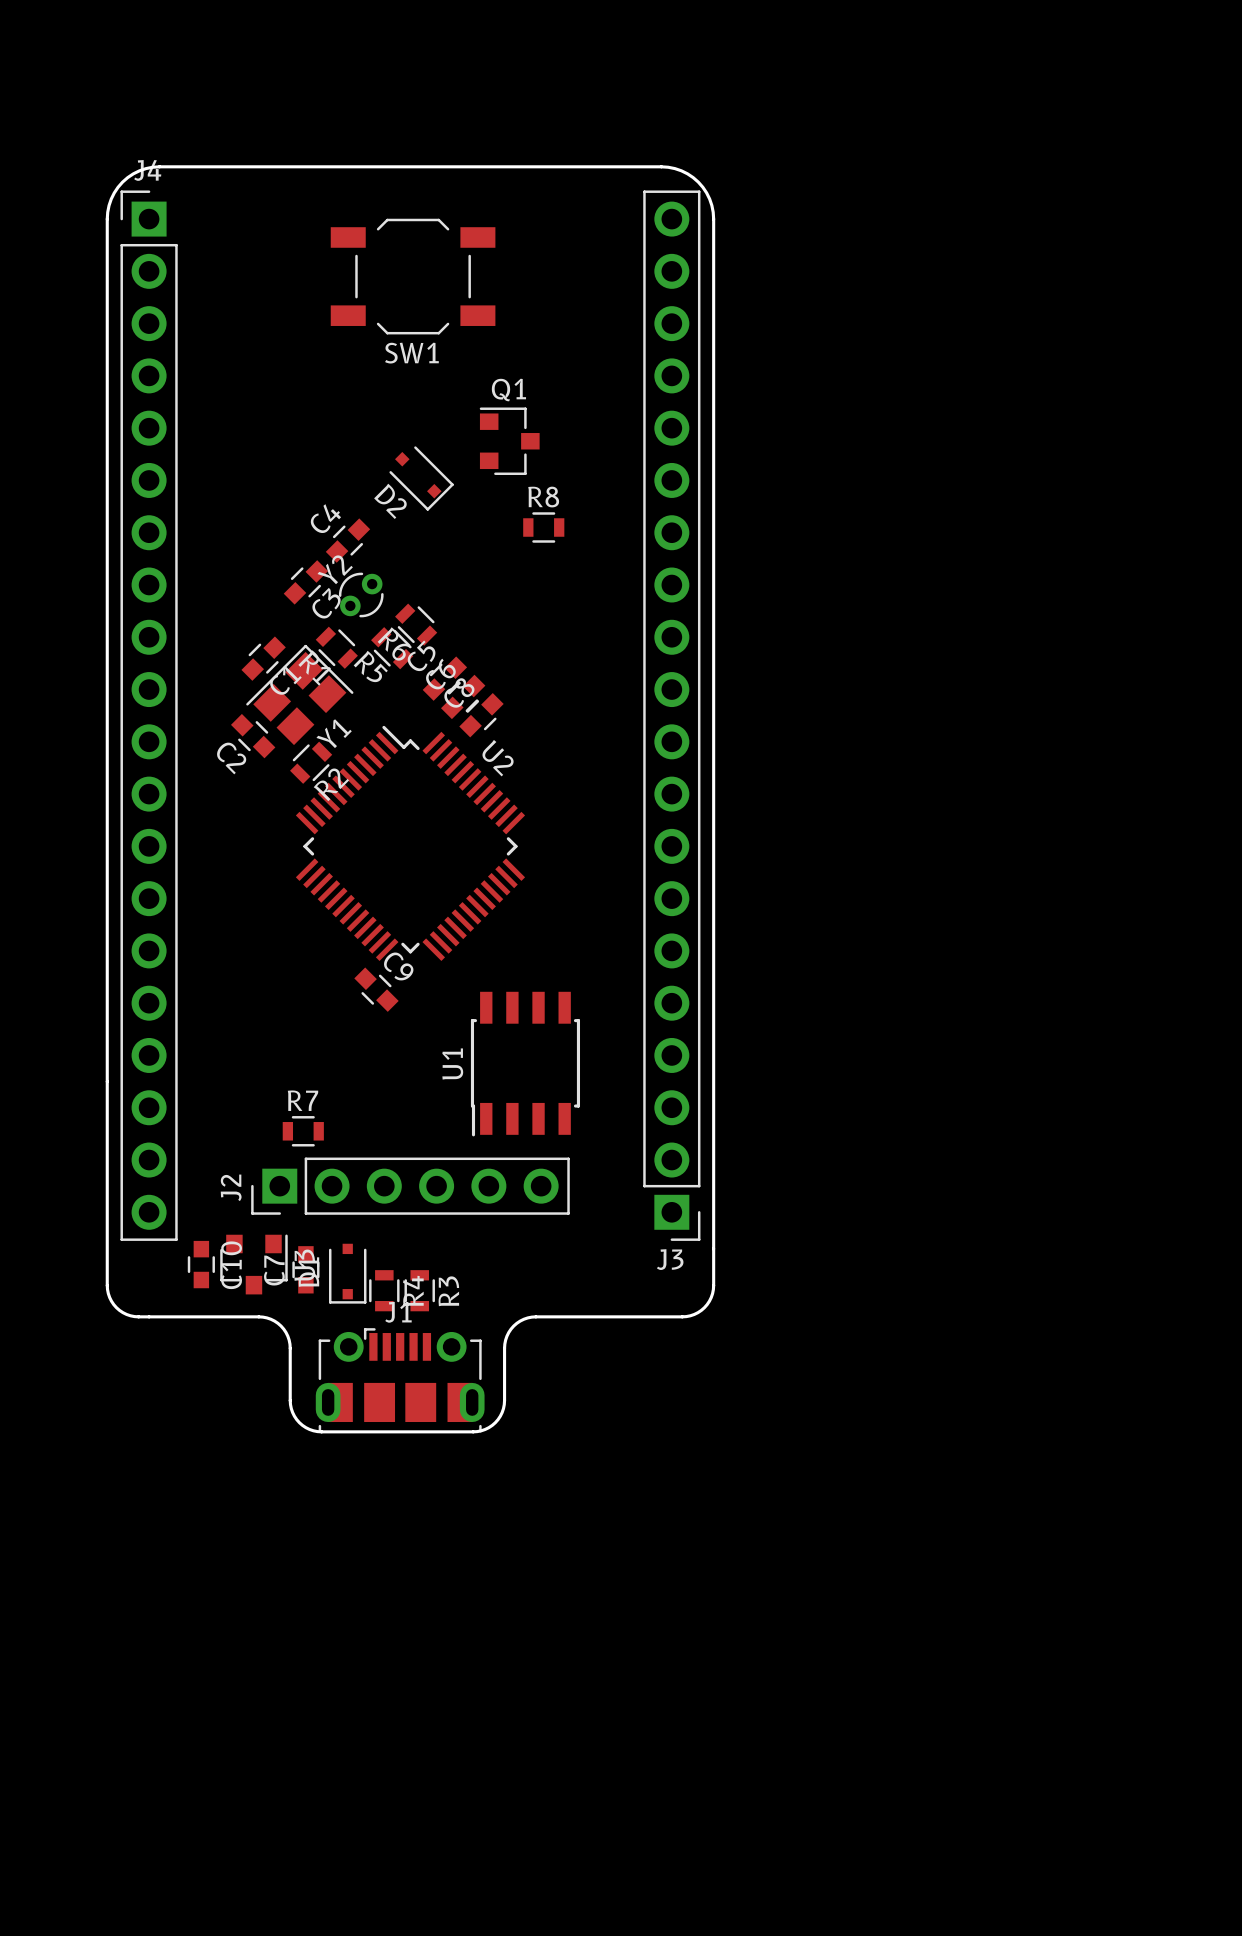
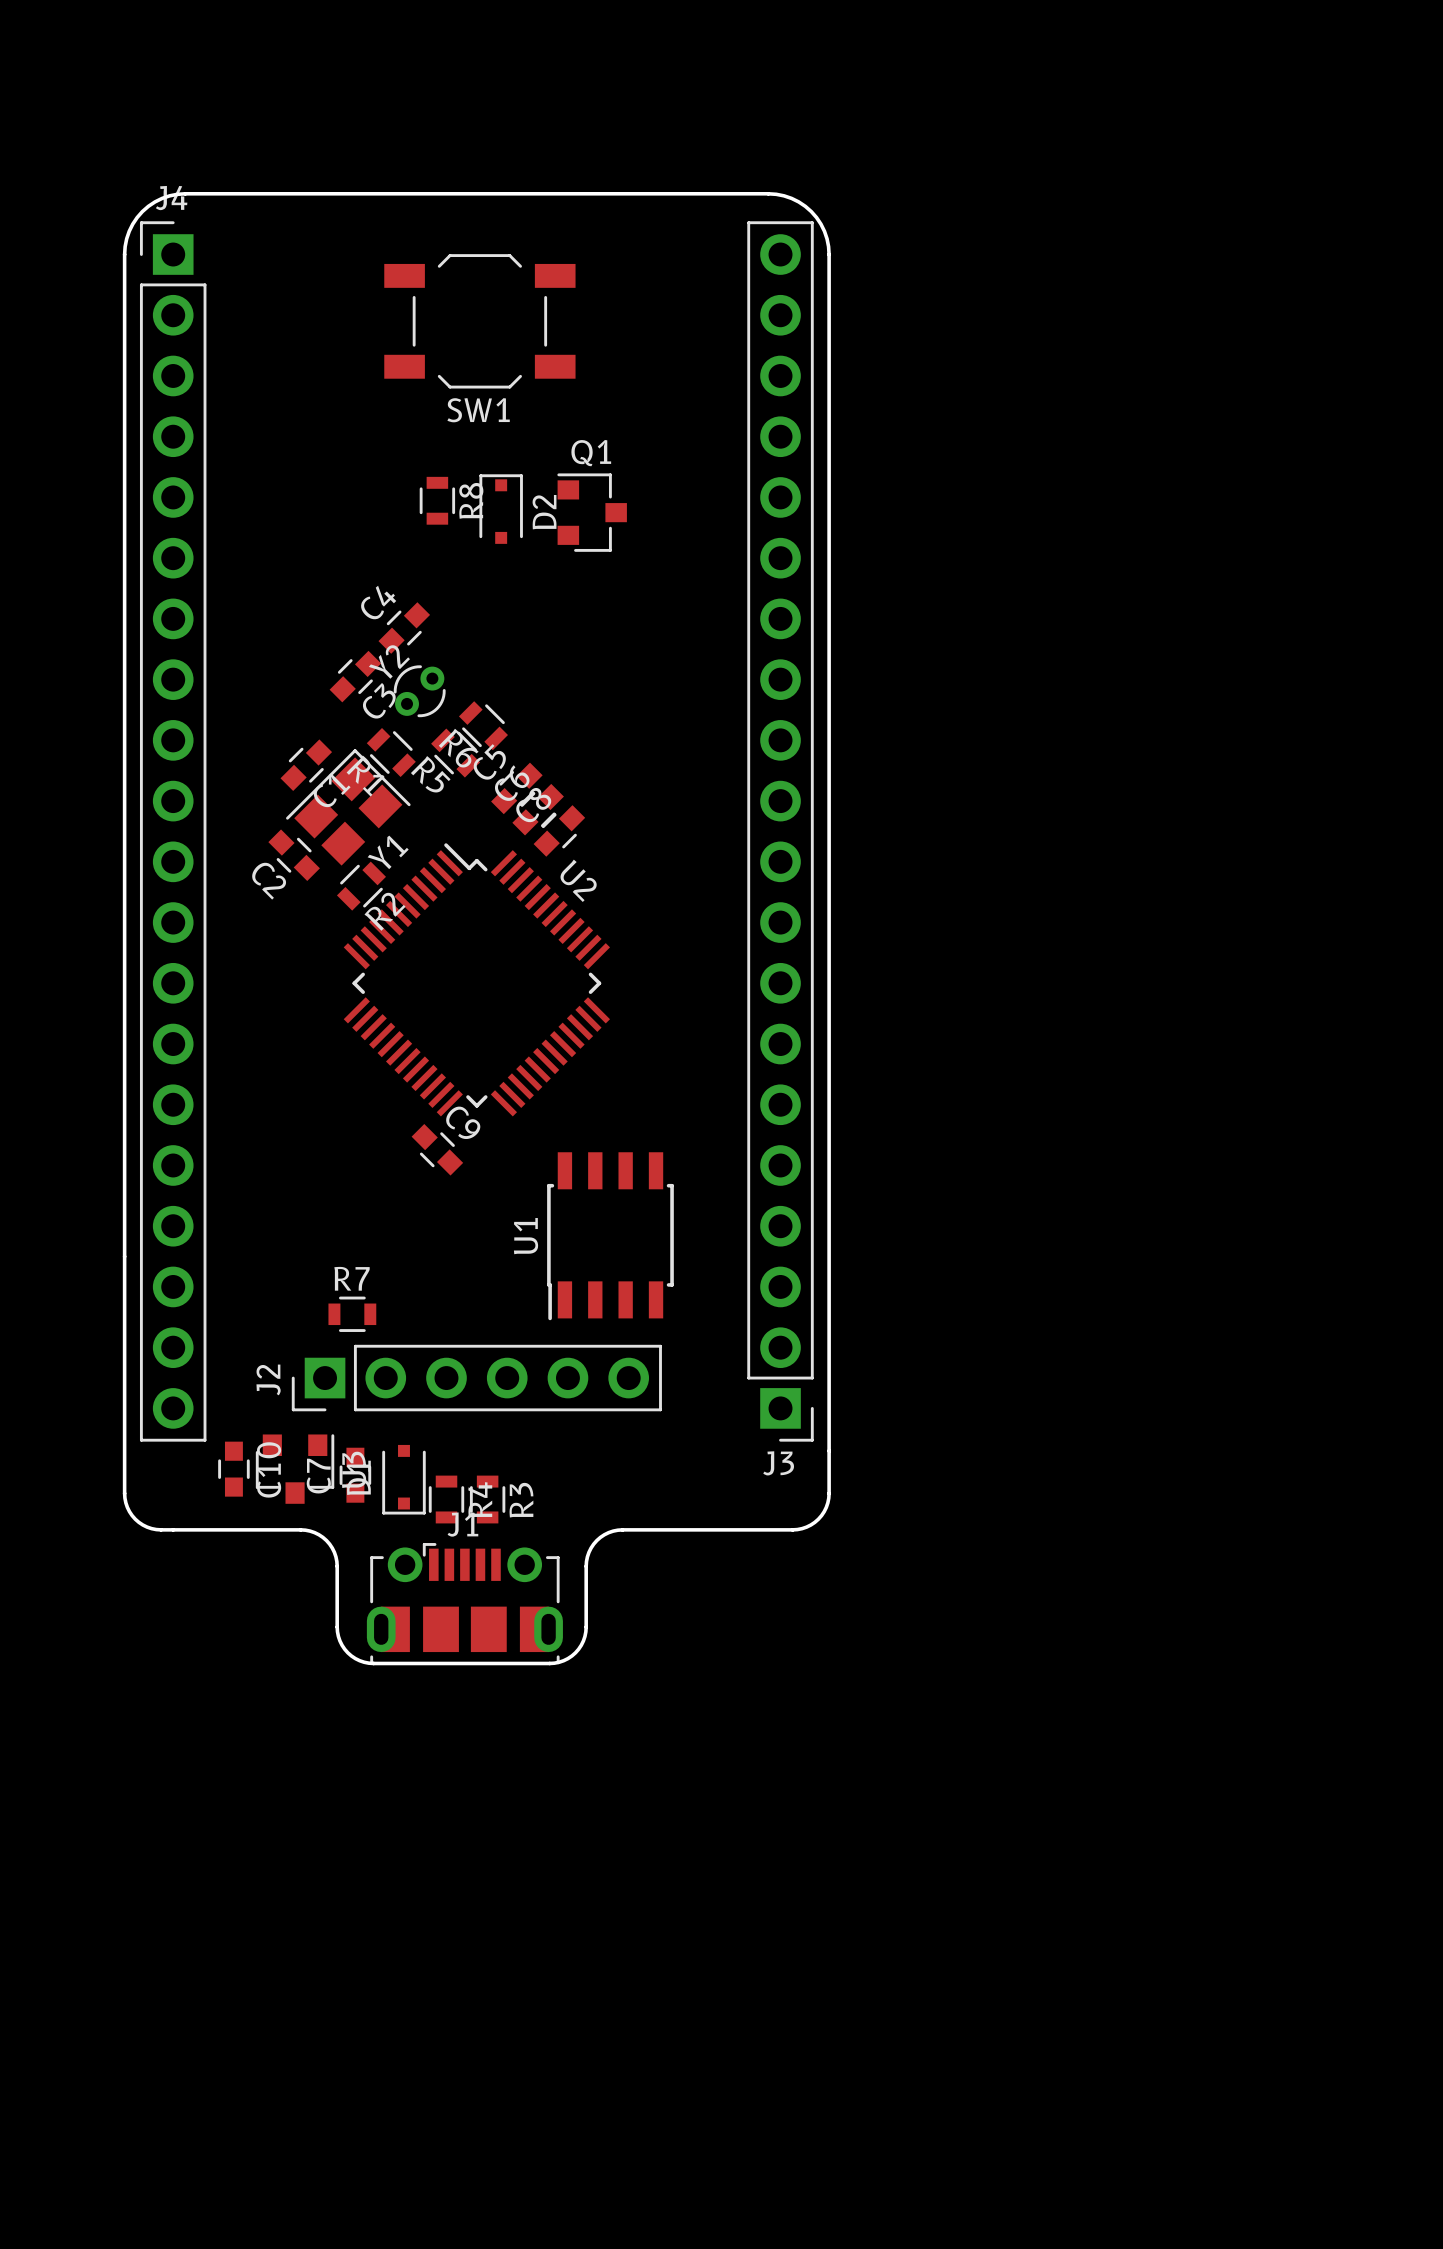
D2 rotation: 0° (421, 478) -> 135° counterclockwise (501, 509)
D2 position: (421, 478) -> (501, 509)
R8 rotation: 0° (543, 527) -> 90° clockwise (437, 500)
R8 position: (543, 527) -> (437, 500)

